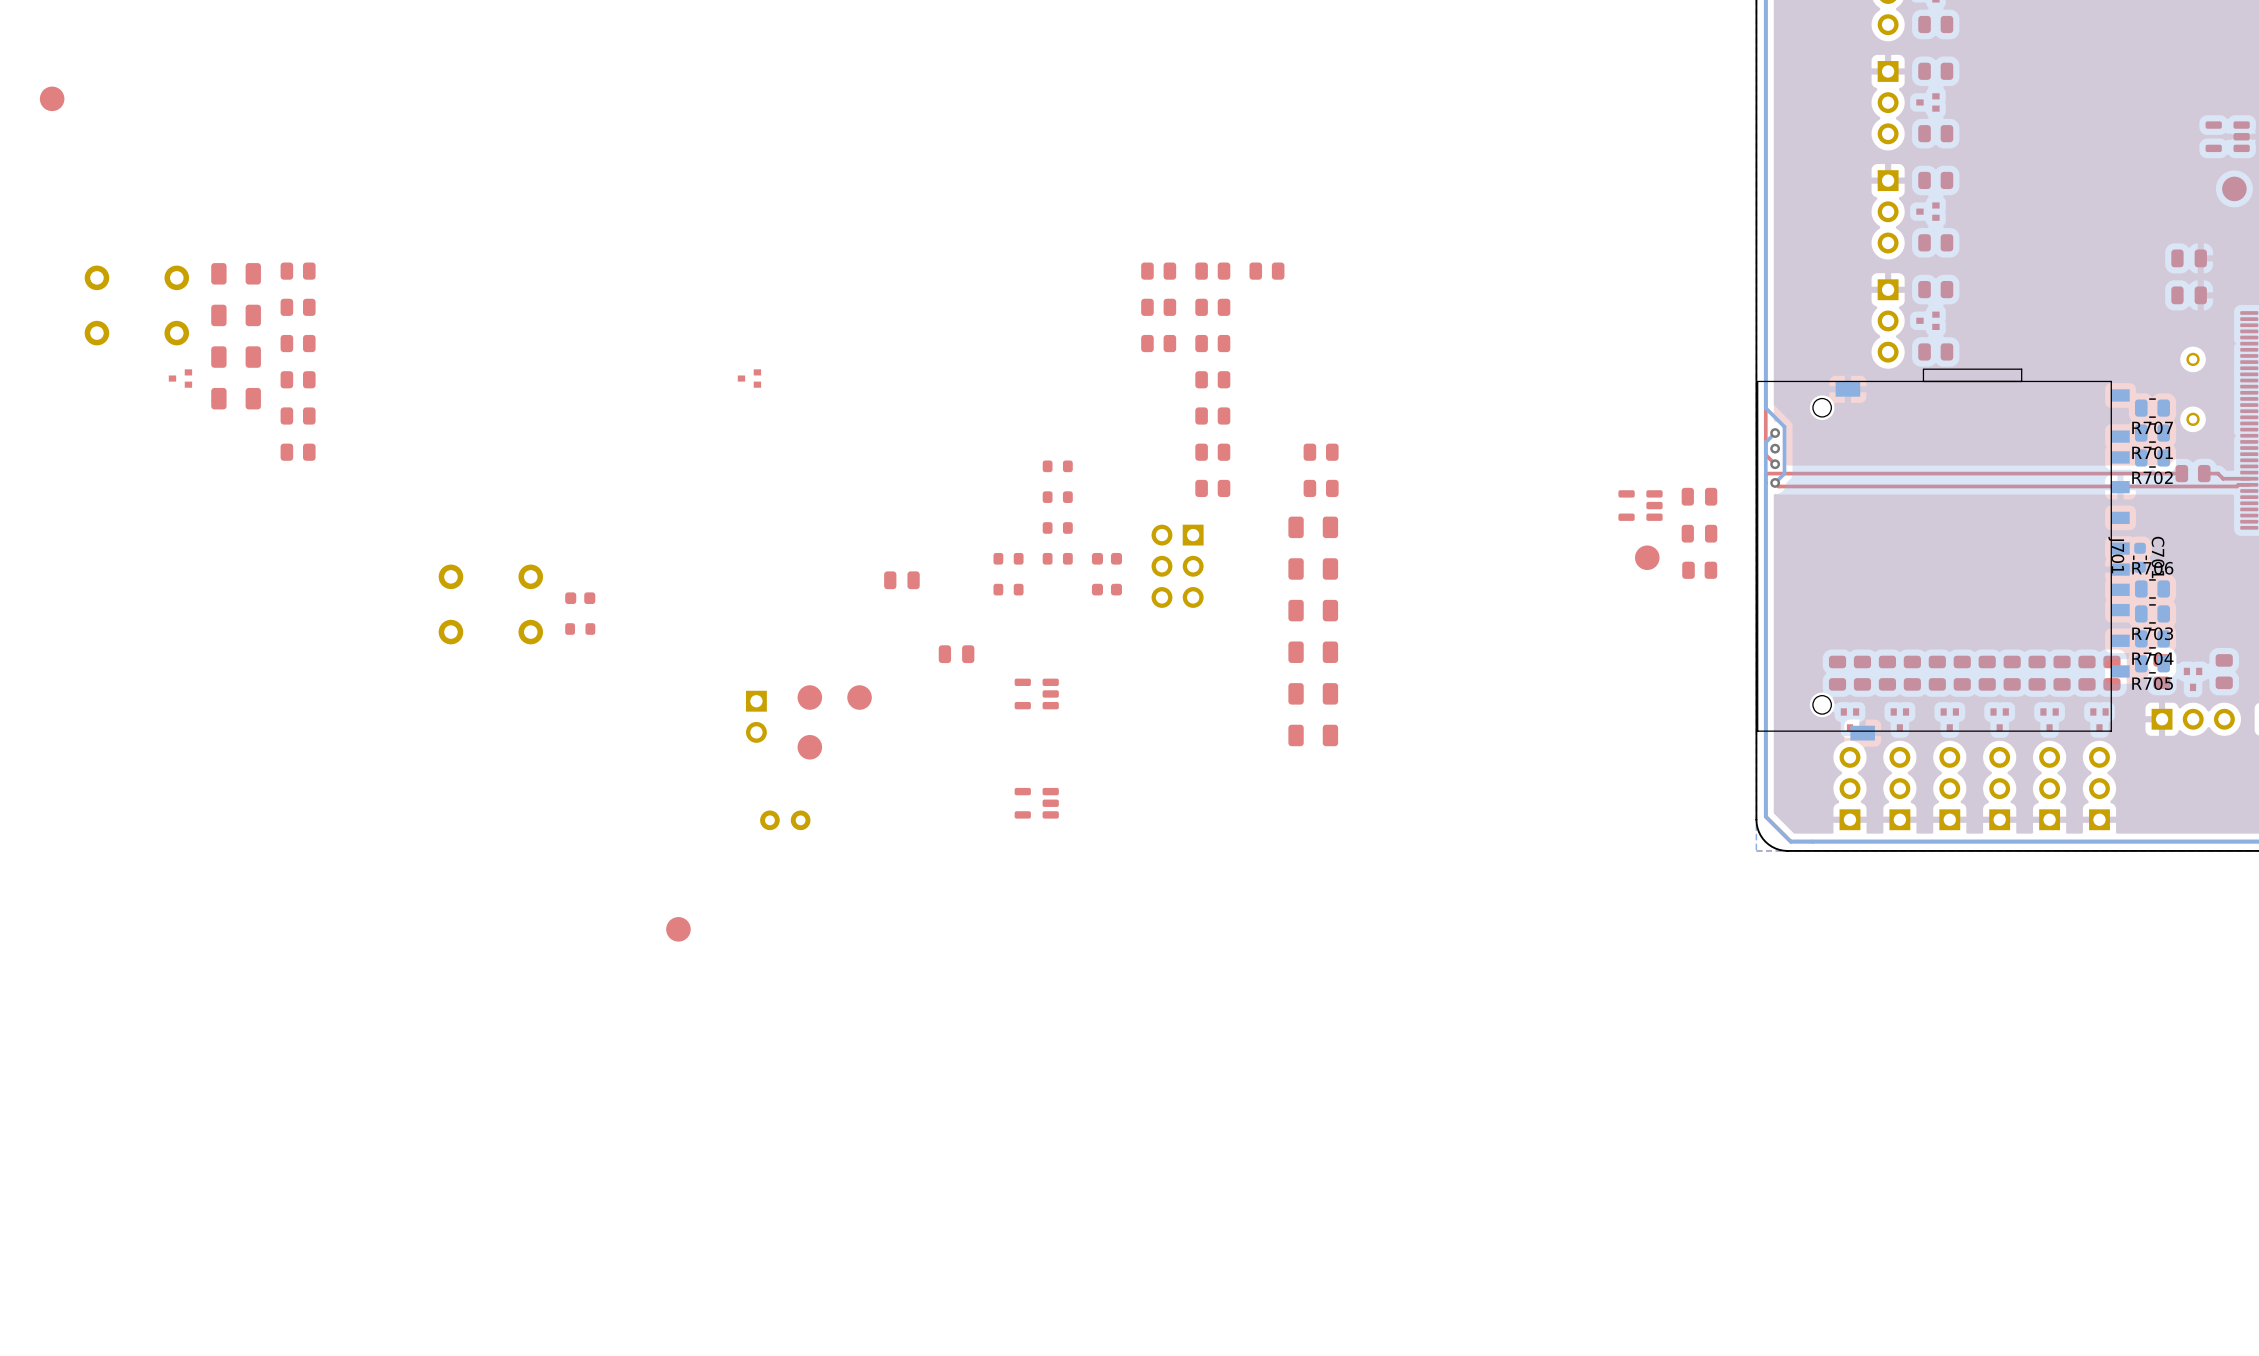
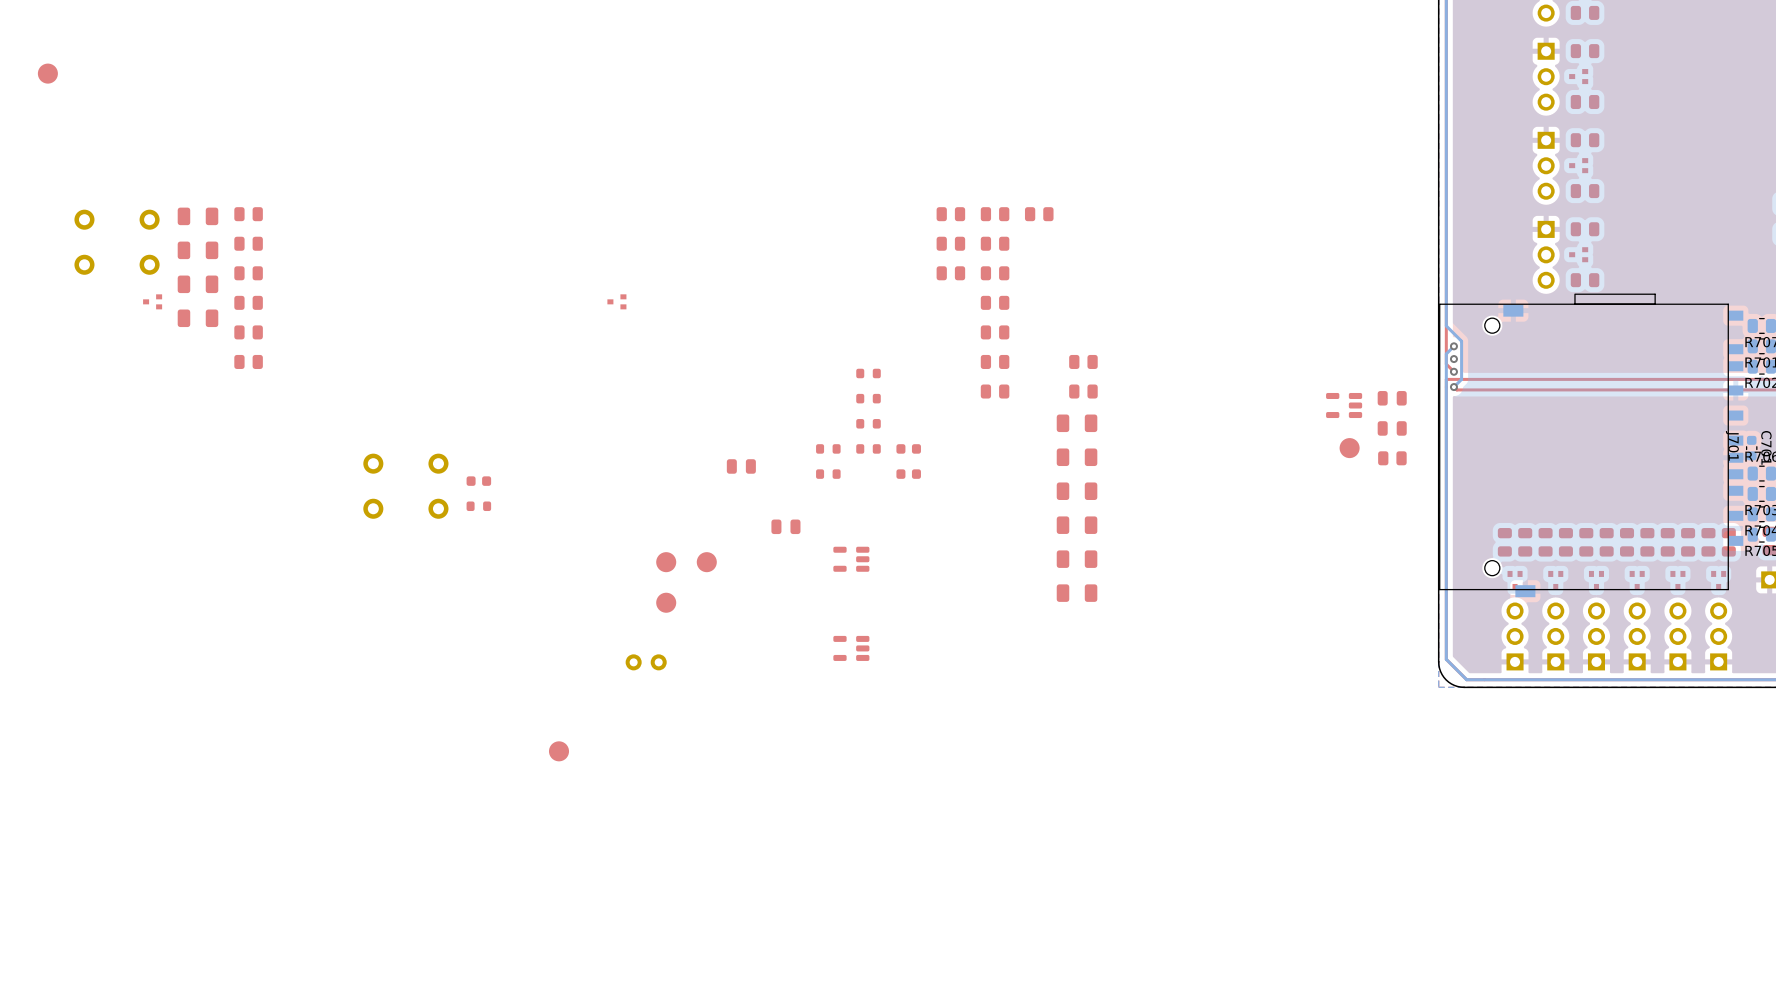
part: (1177, 566) -> none
part: (756, 716) -> none

